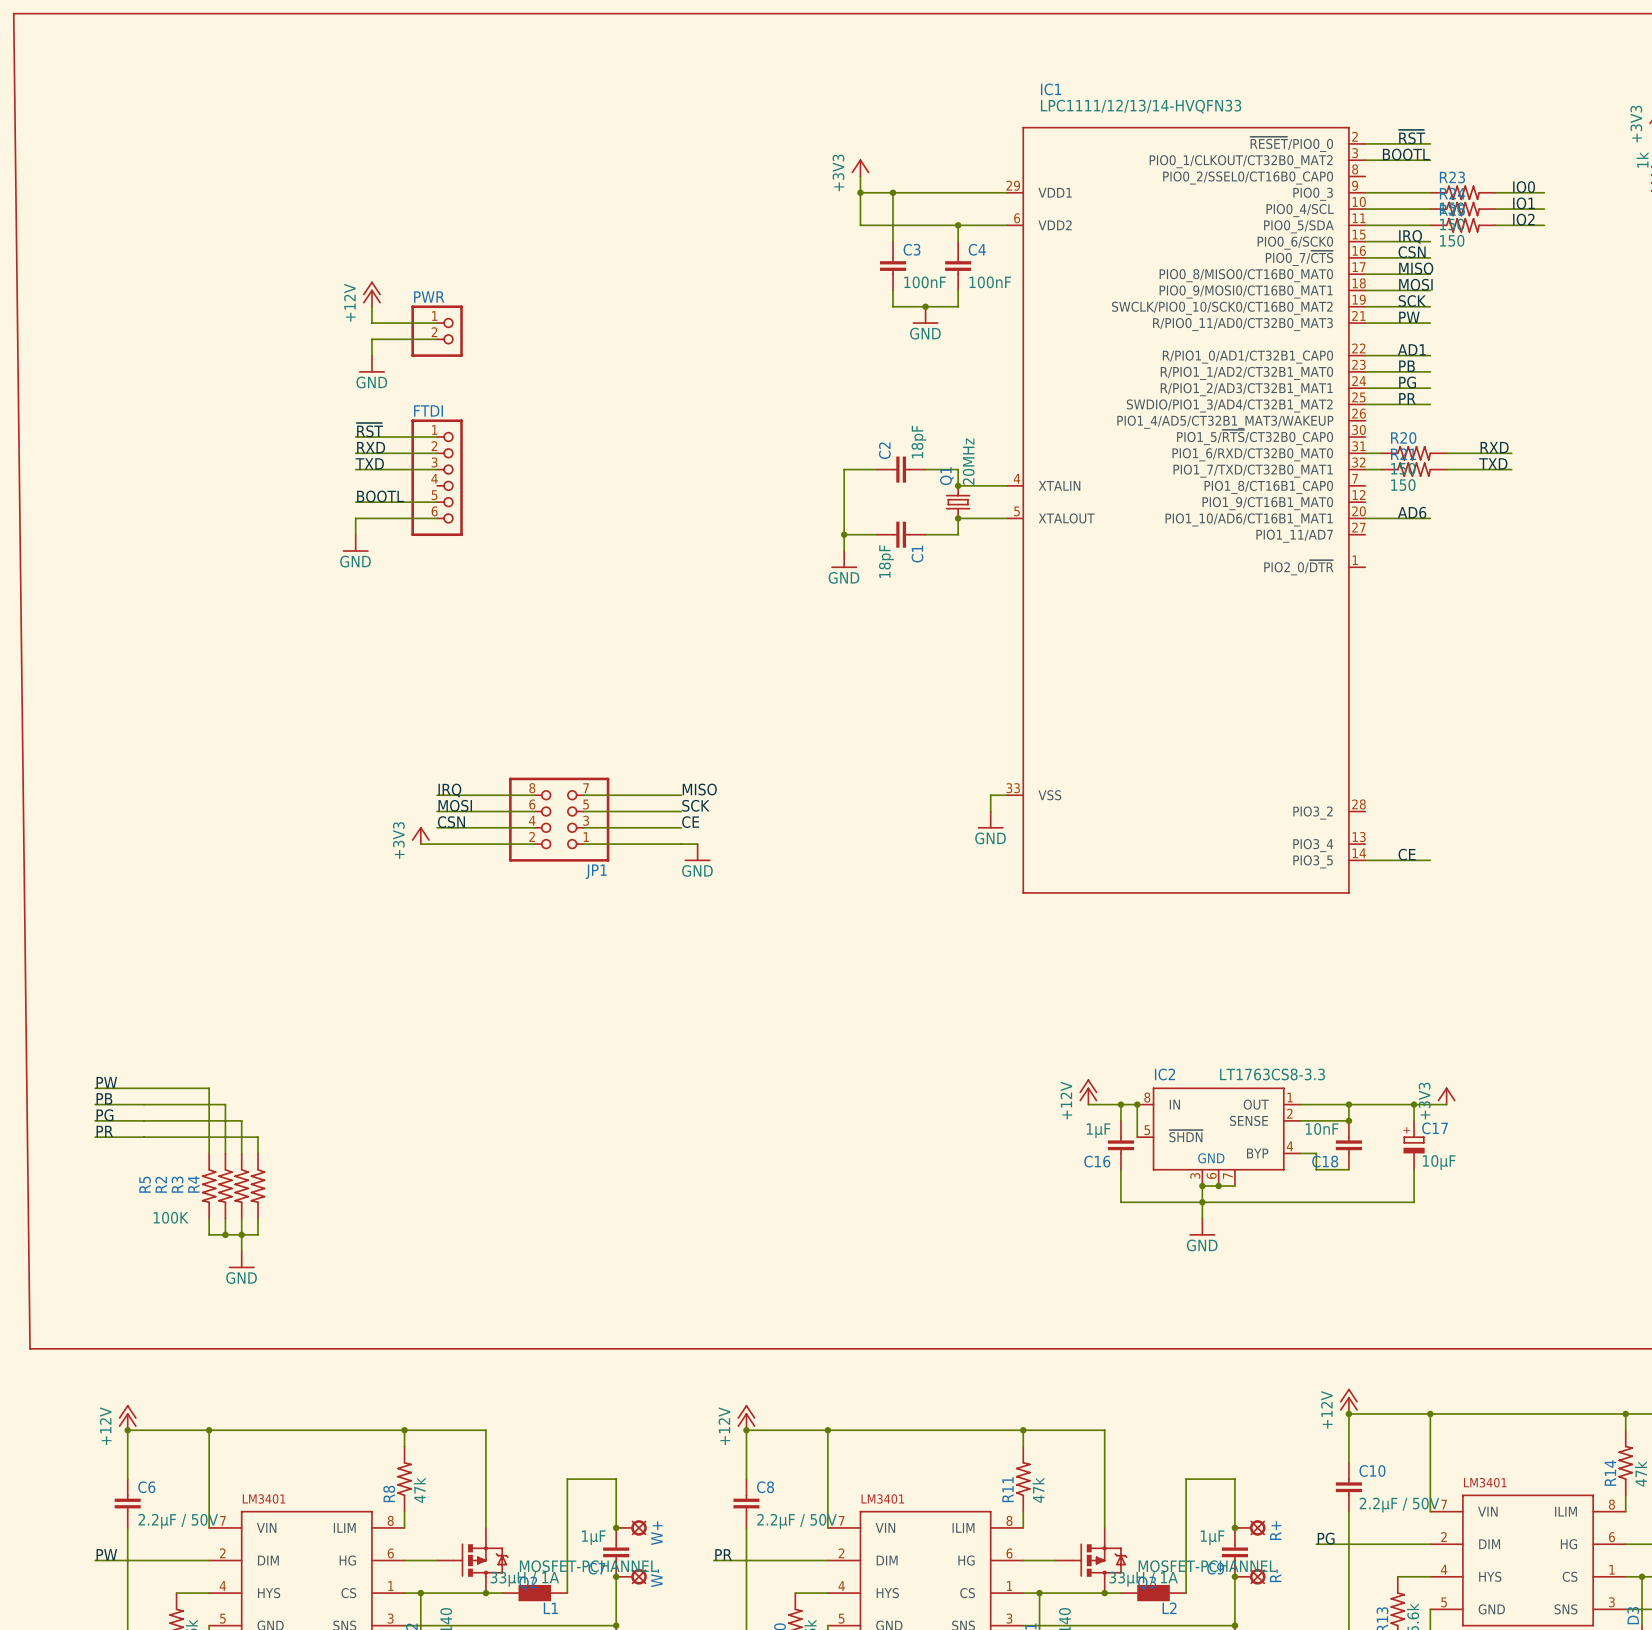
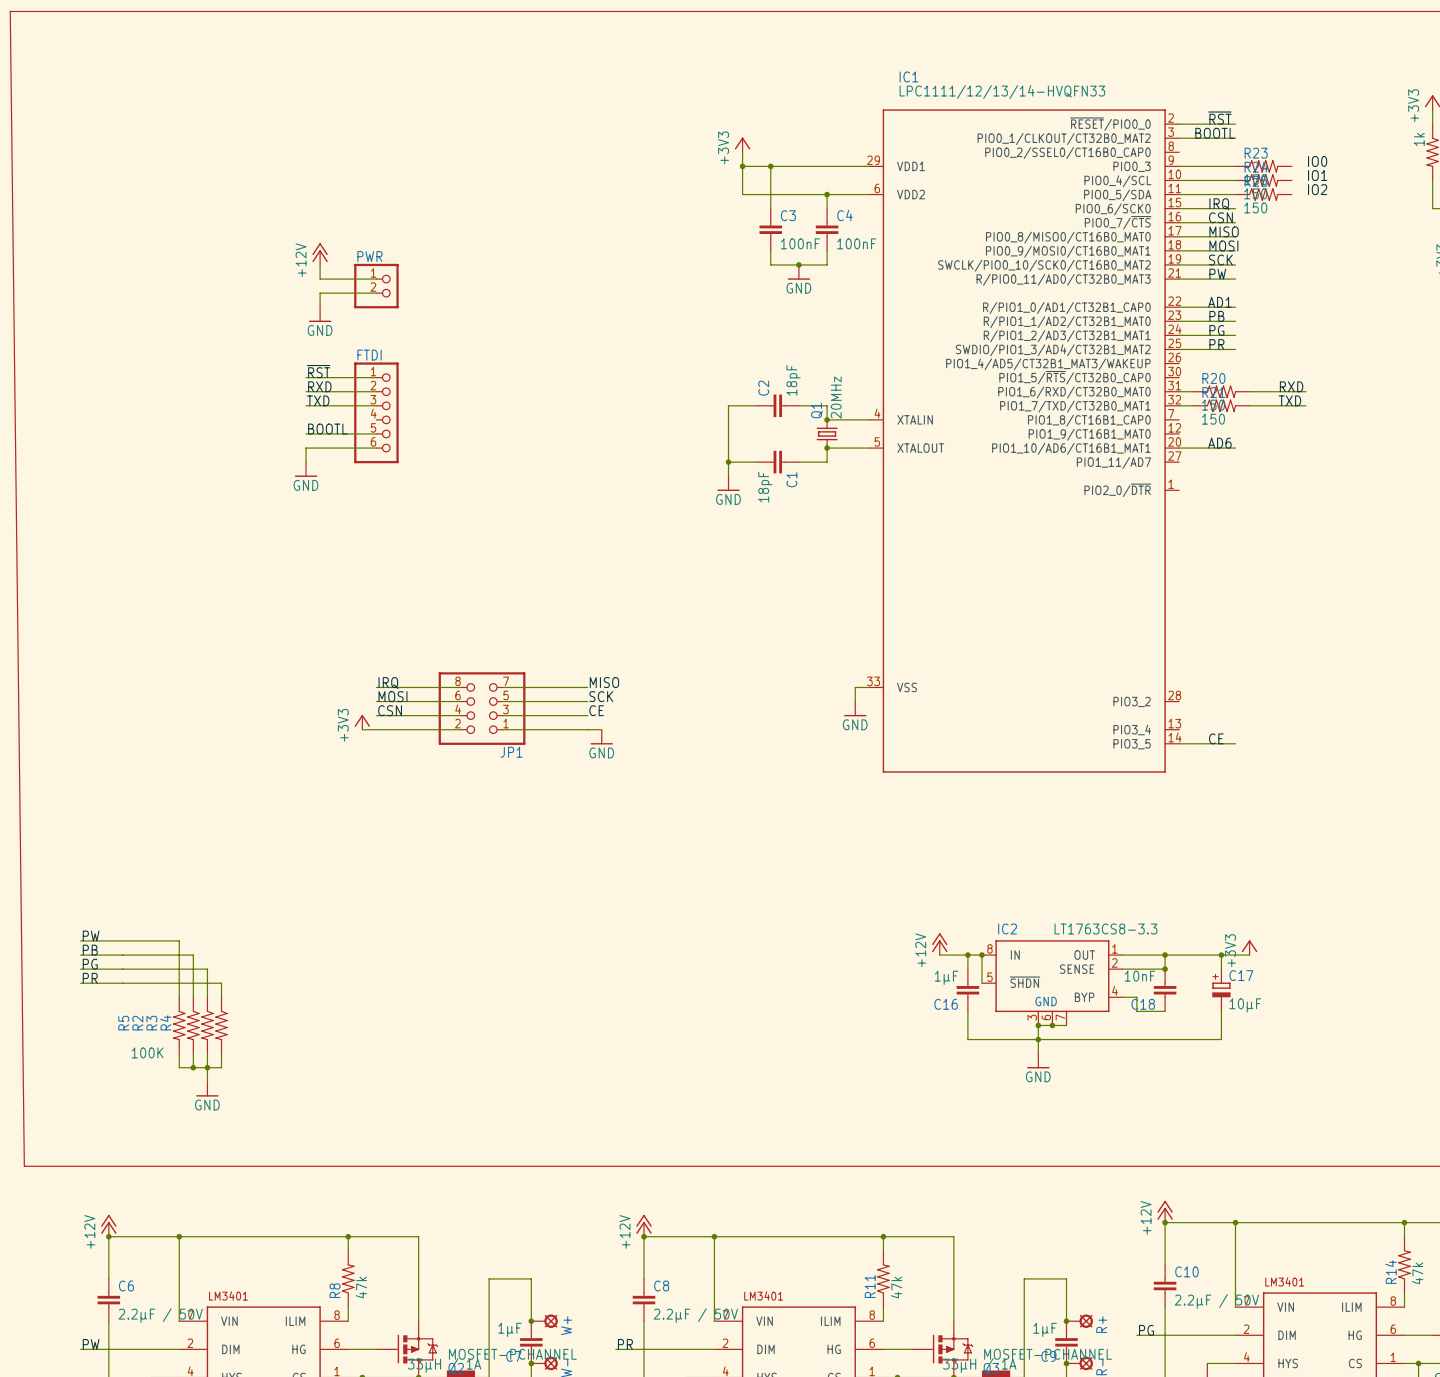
wire: (1495, 192) (1544, 192) -> none
wire: (1495, 209) (1544, 209) -> none
wire: (1495, 225) (1544, 225) -> none

